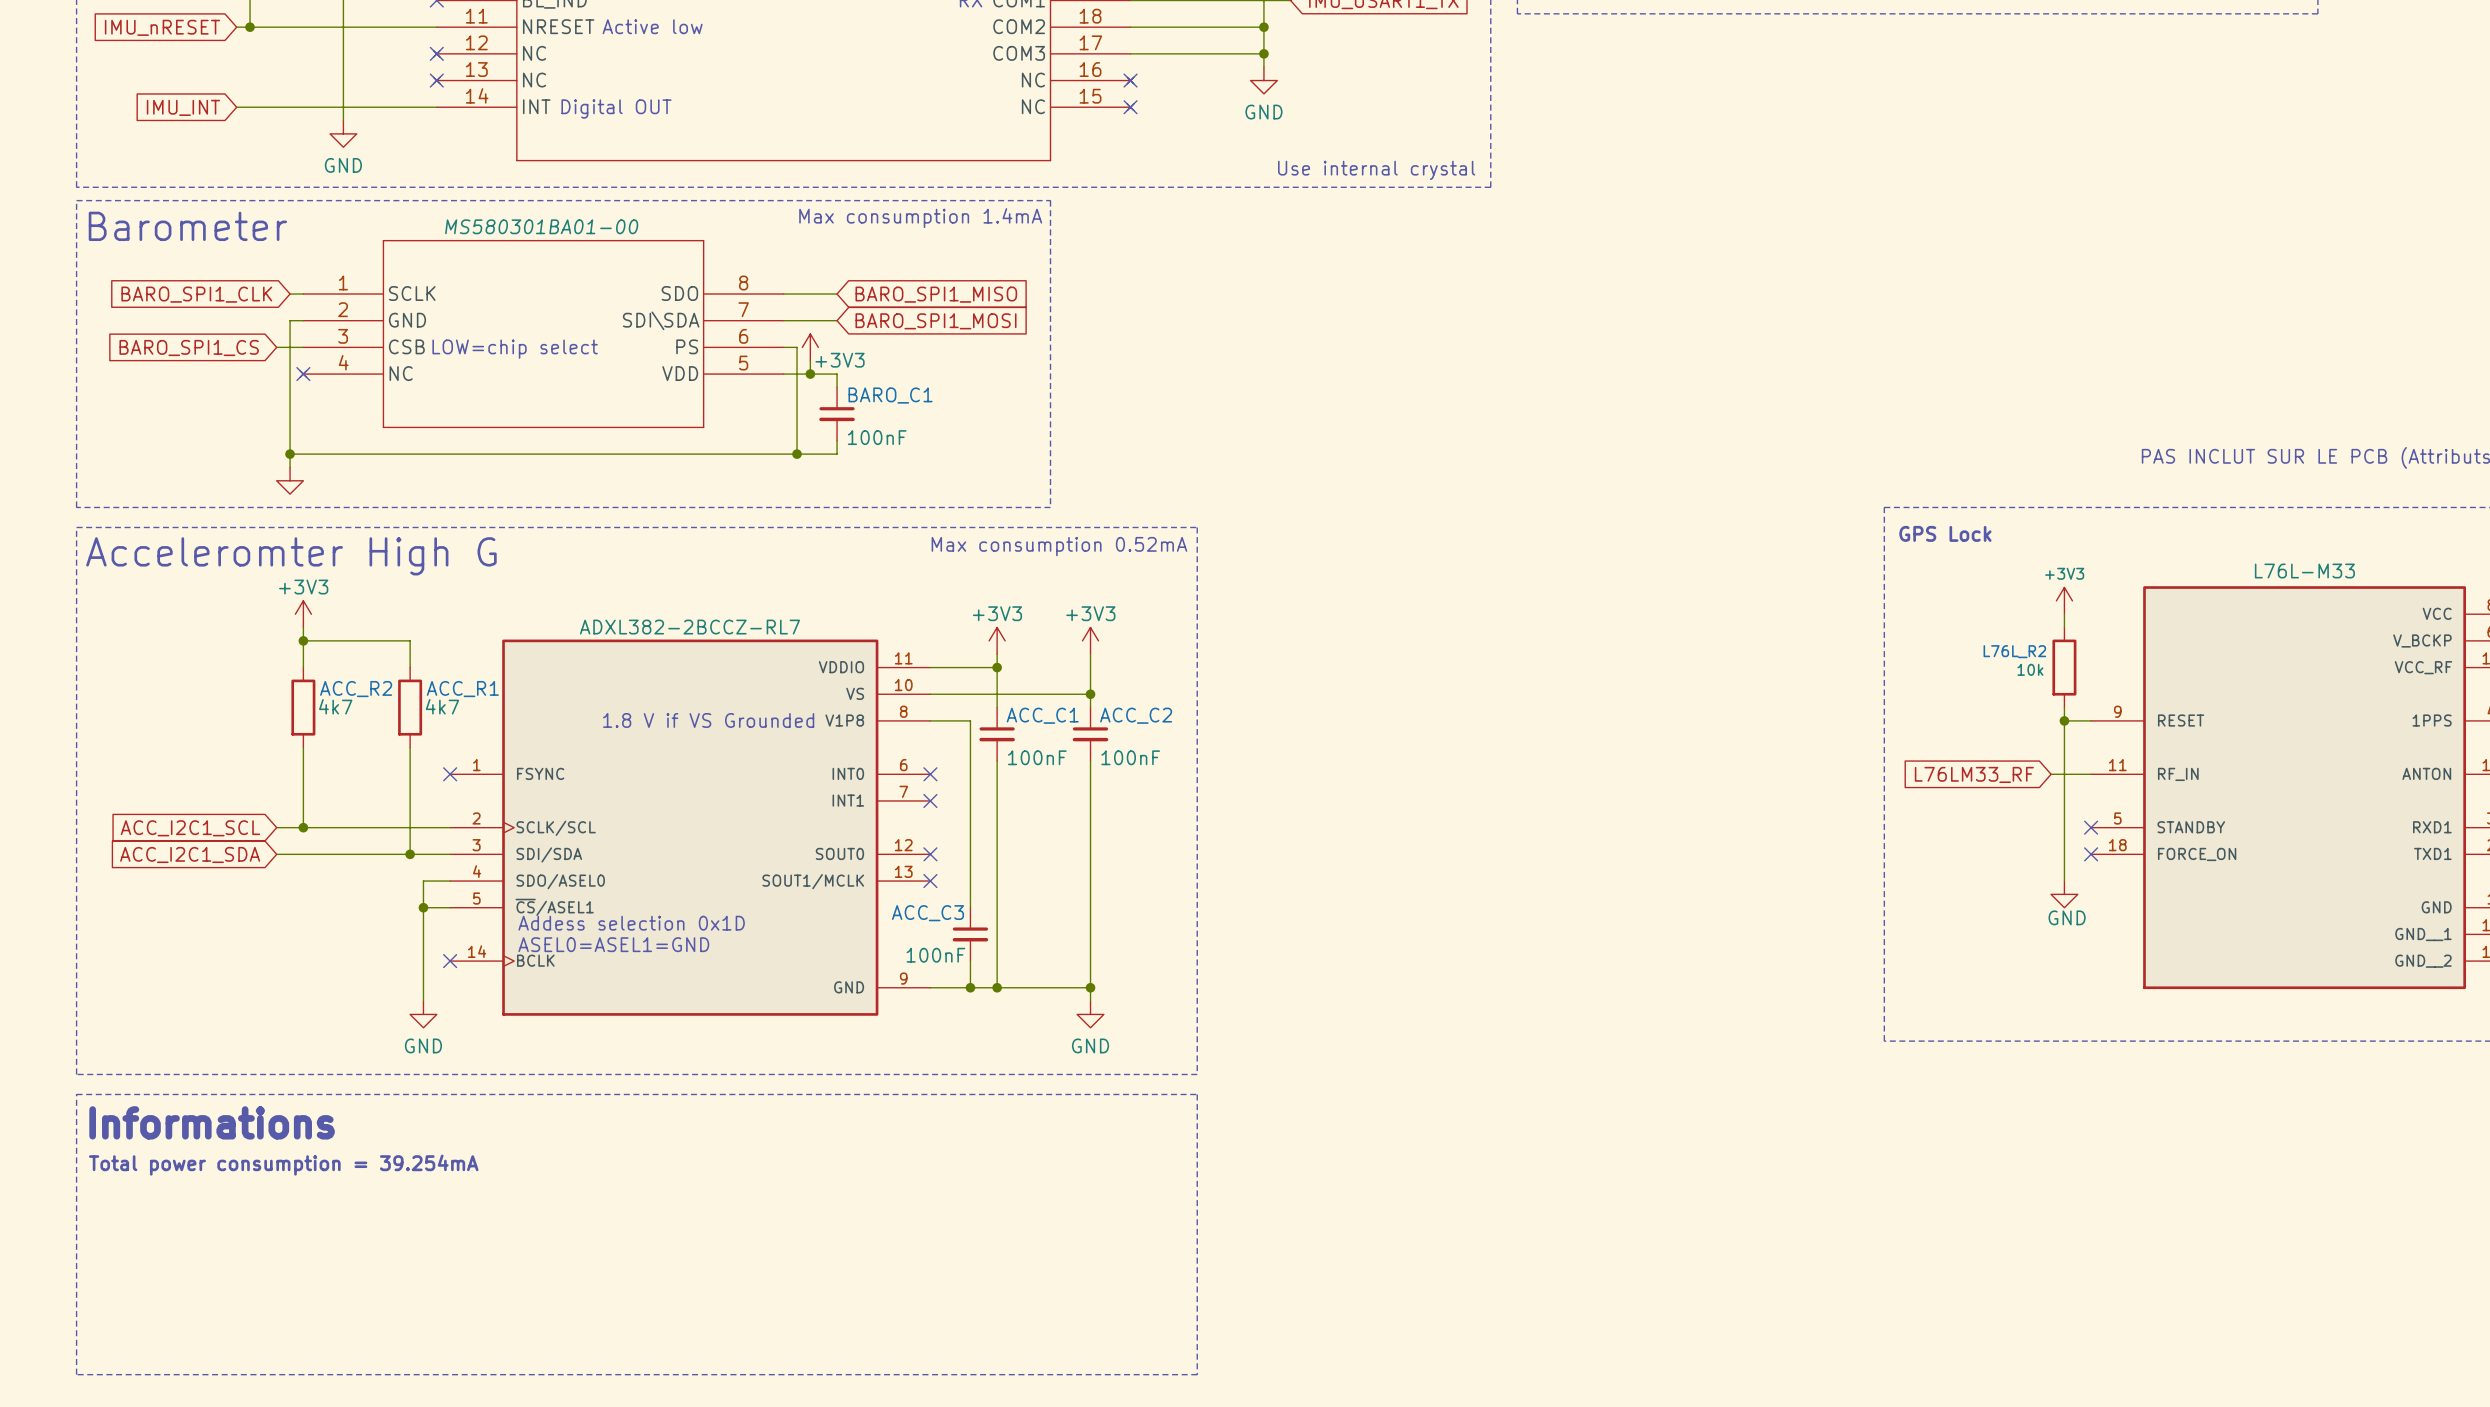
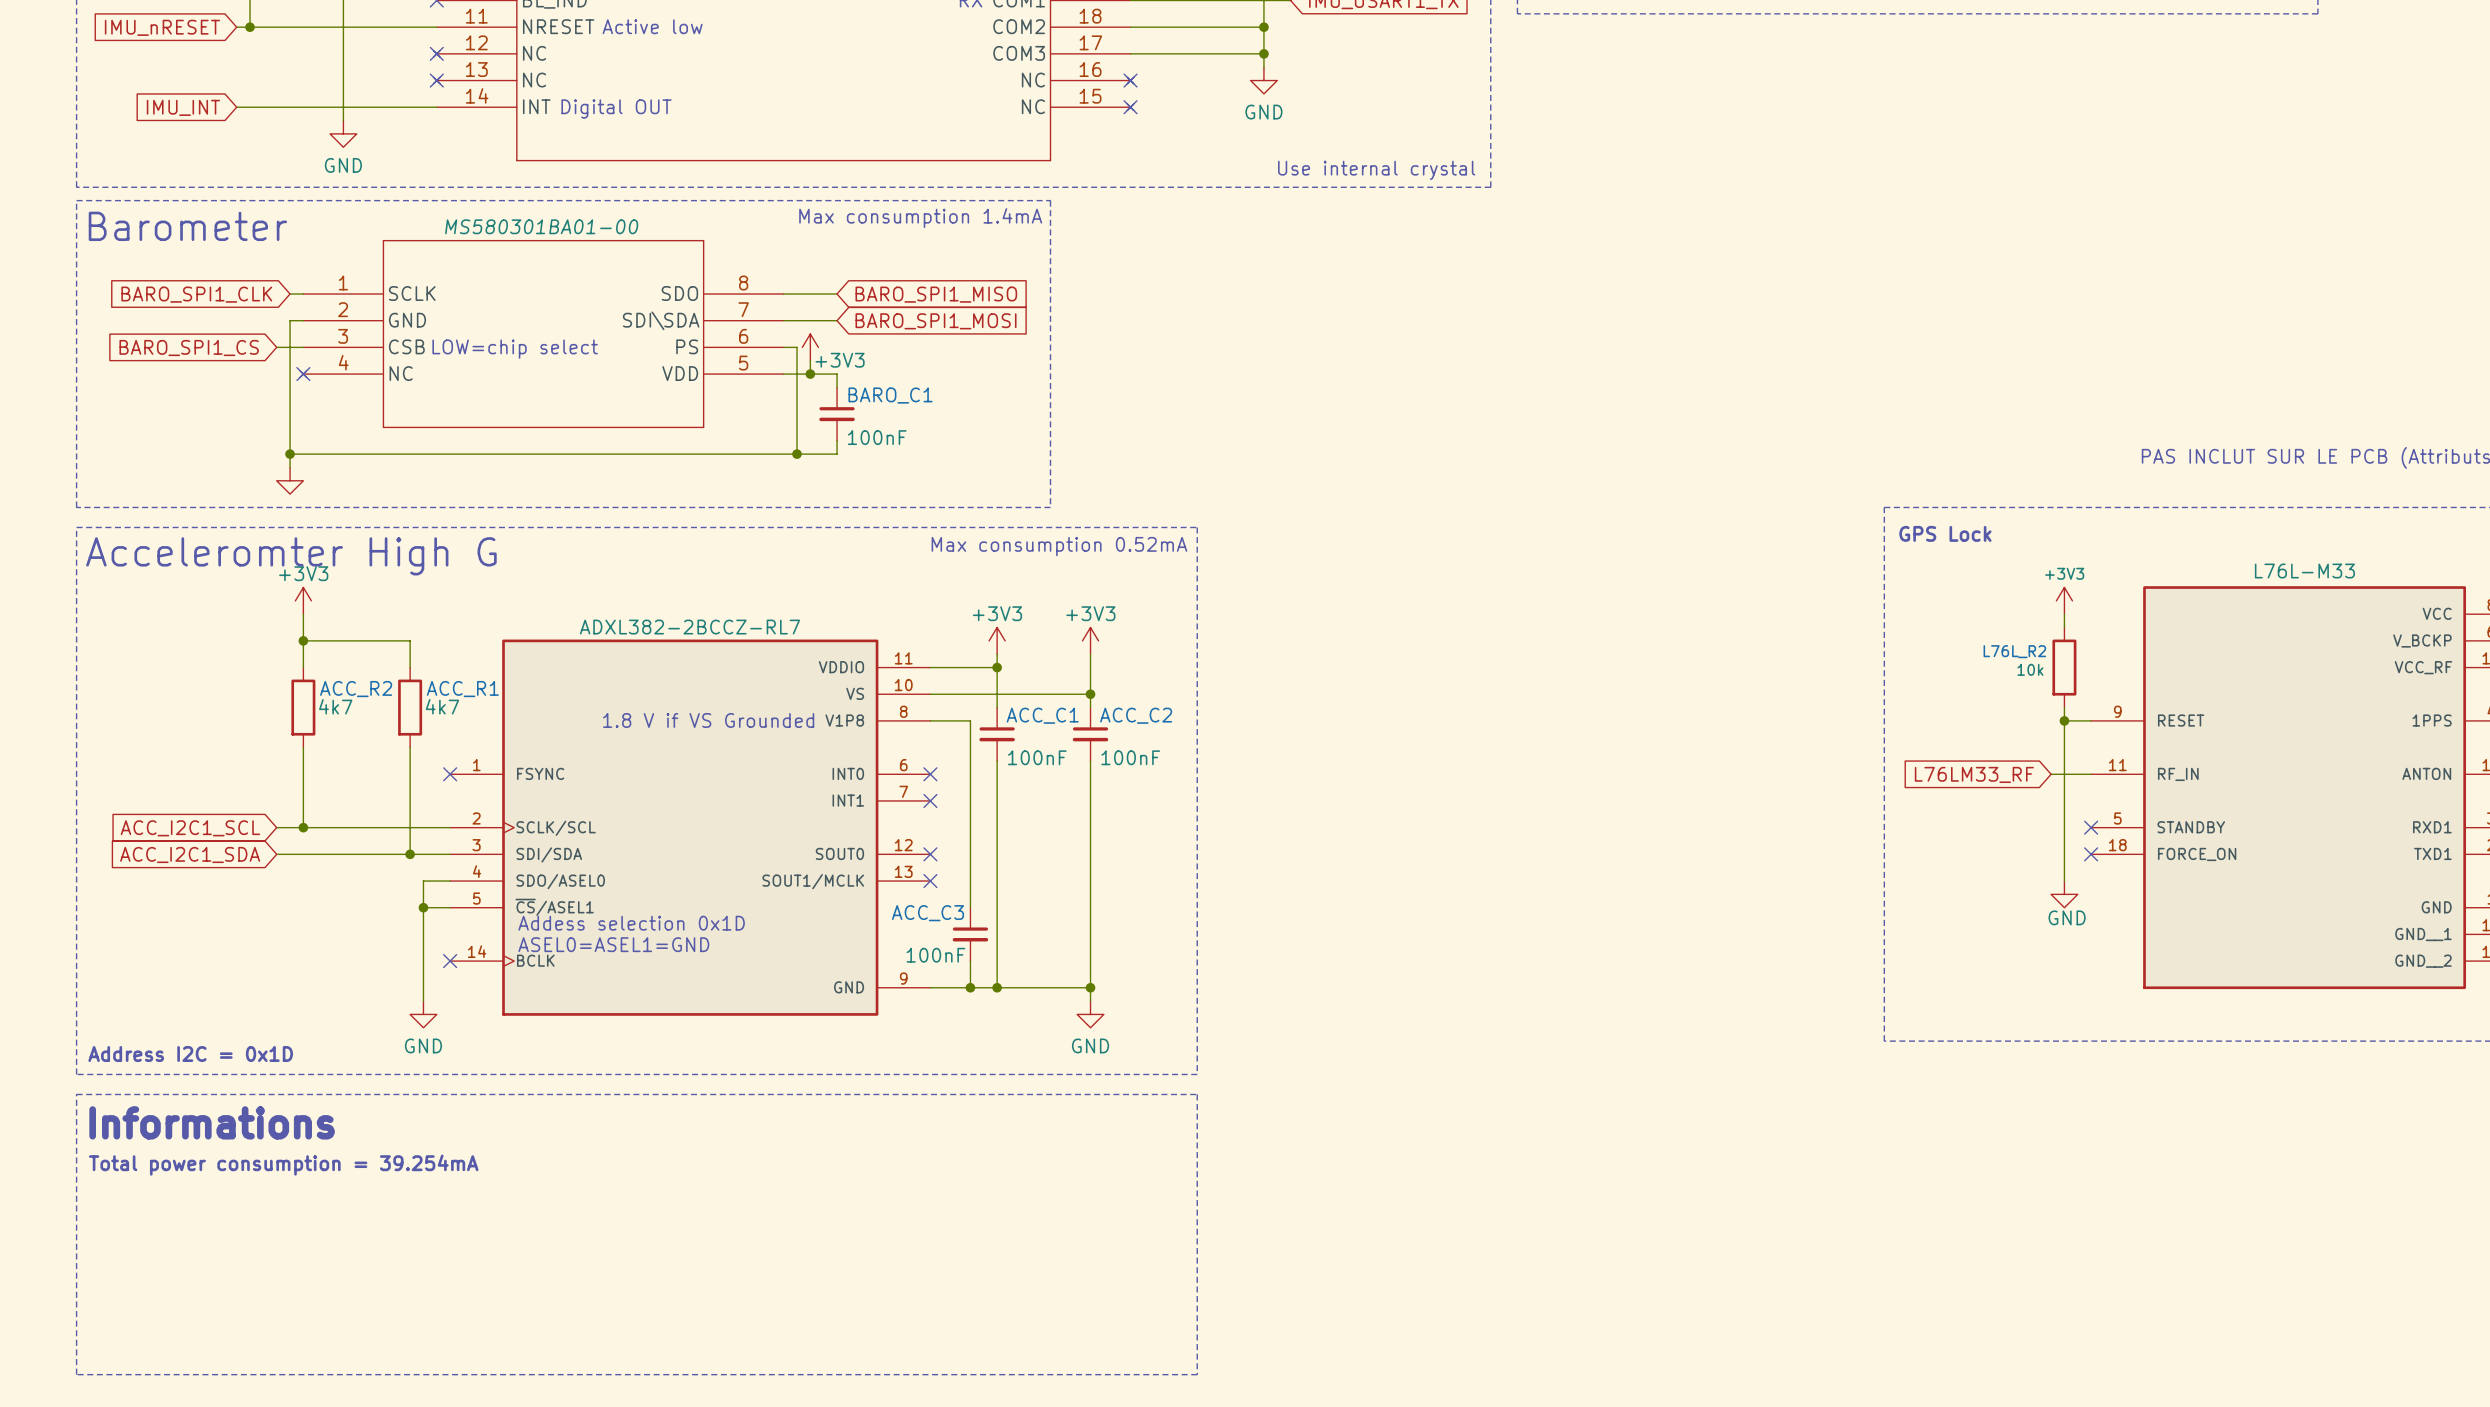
power symbol position: +3V3 (303, 614) -> +3V3 (303, 600)
text: none -> Address I2C = 0x1D (190, 1054)

